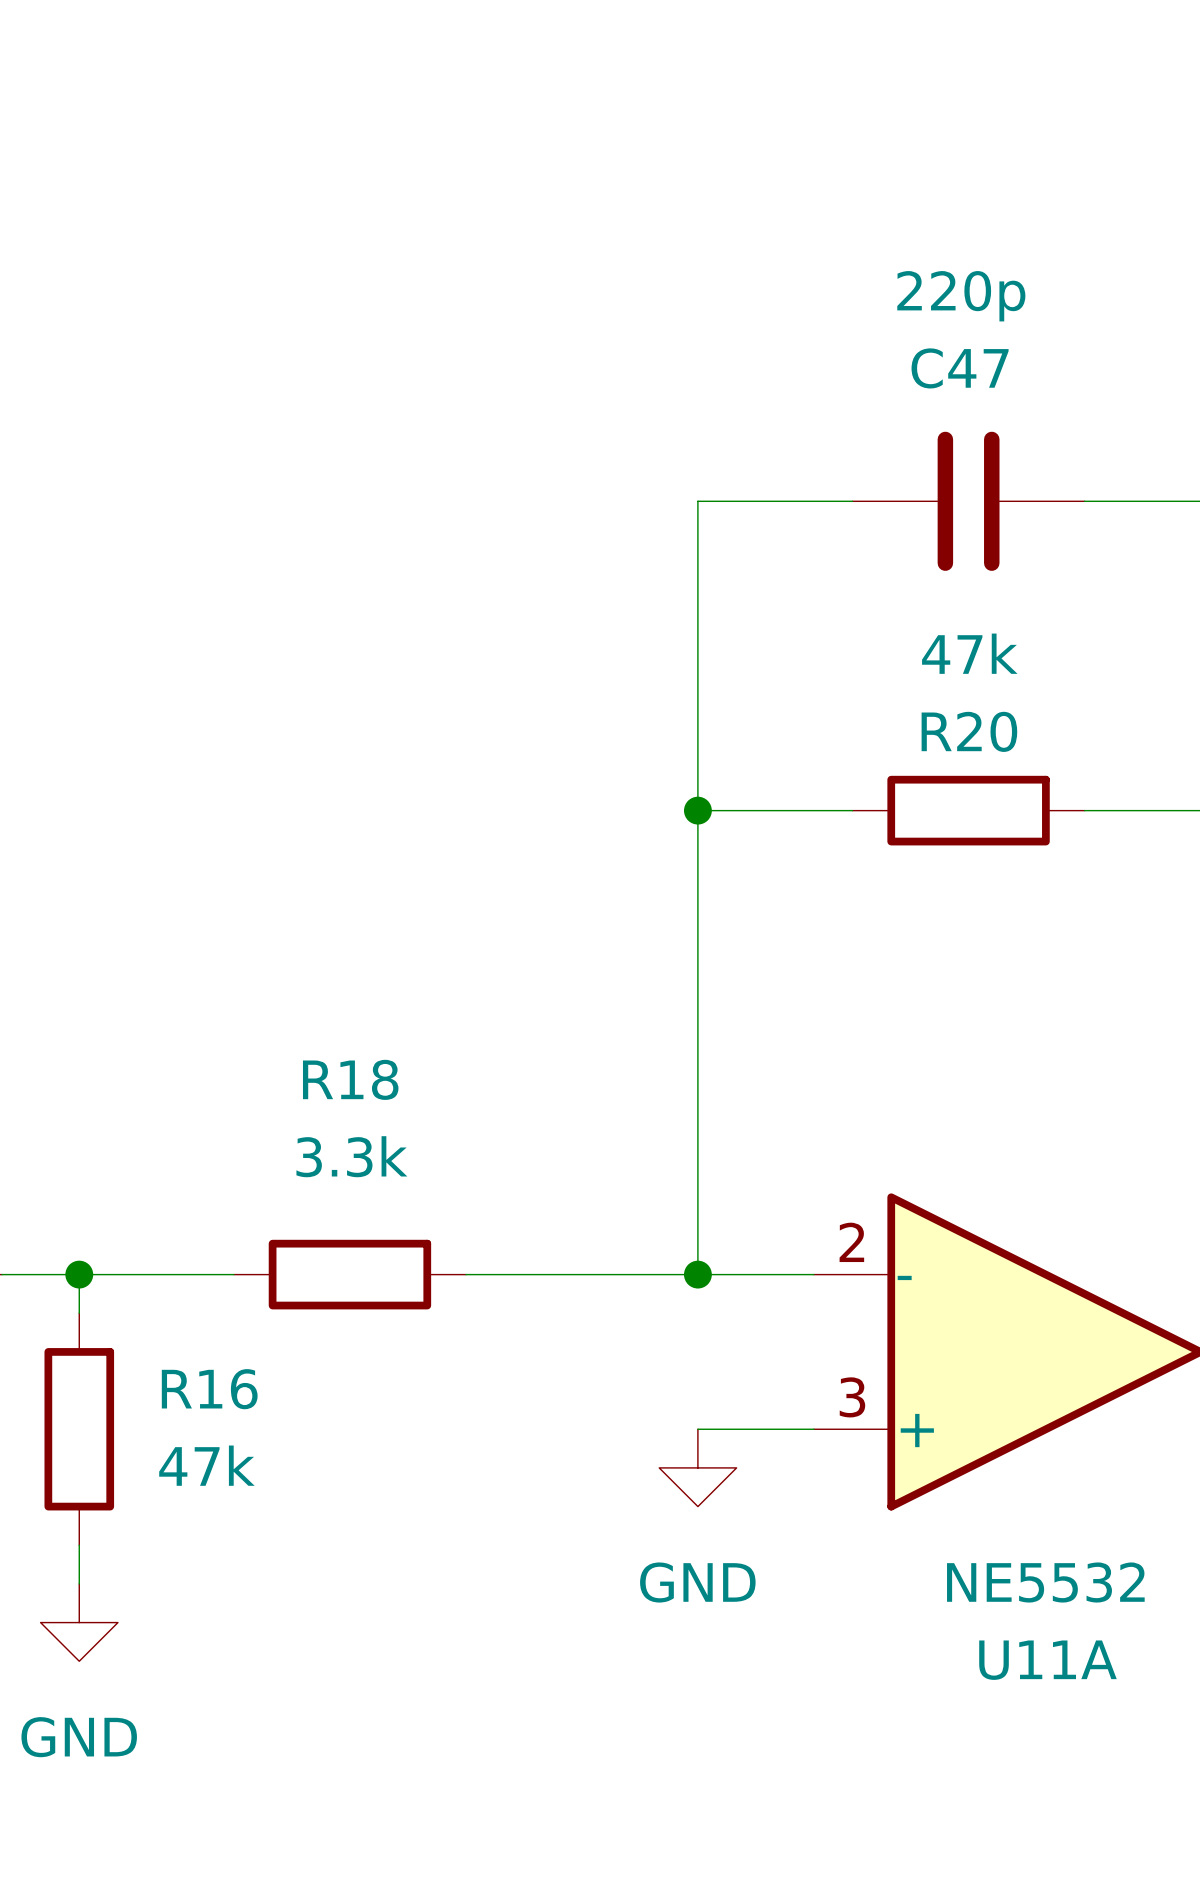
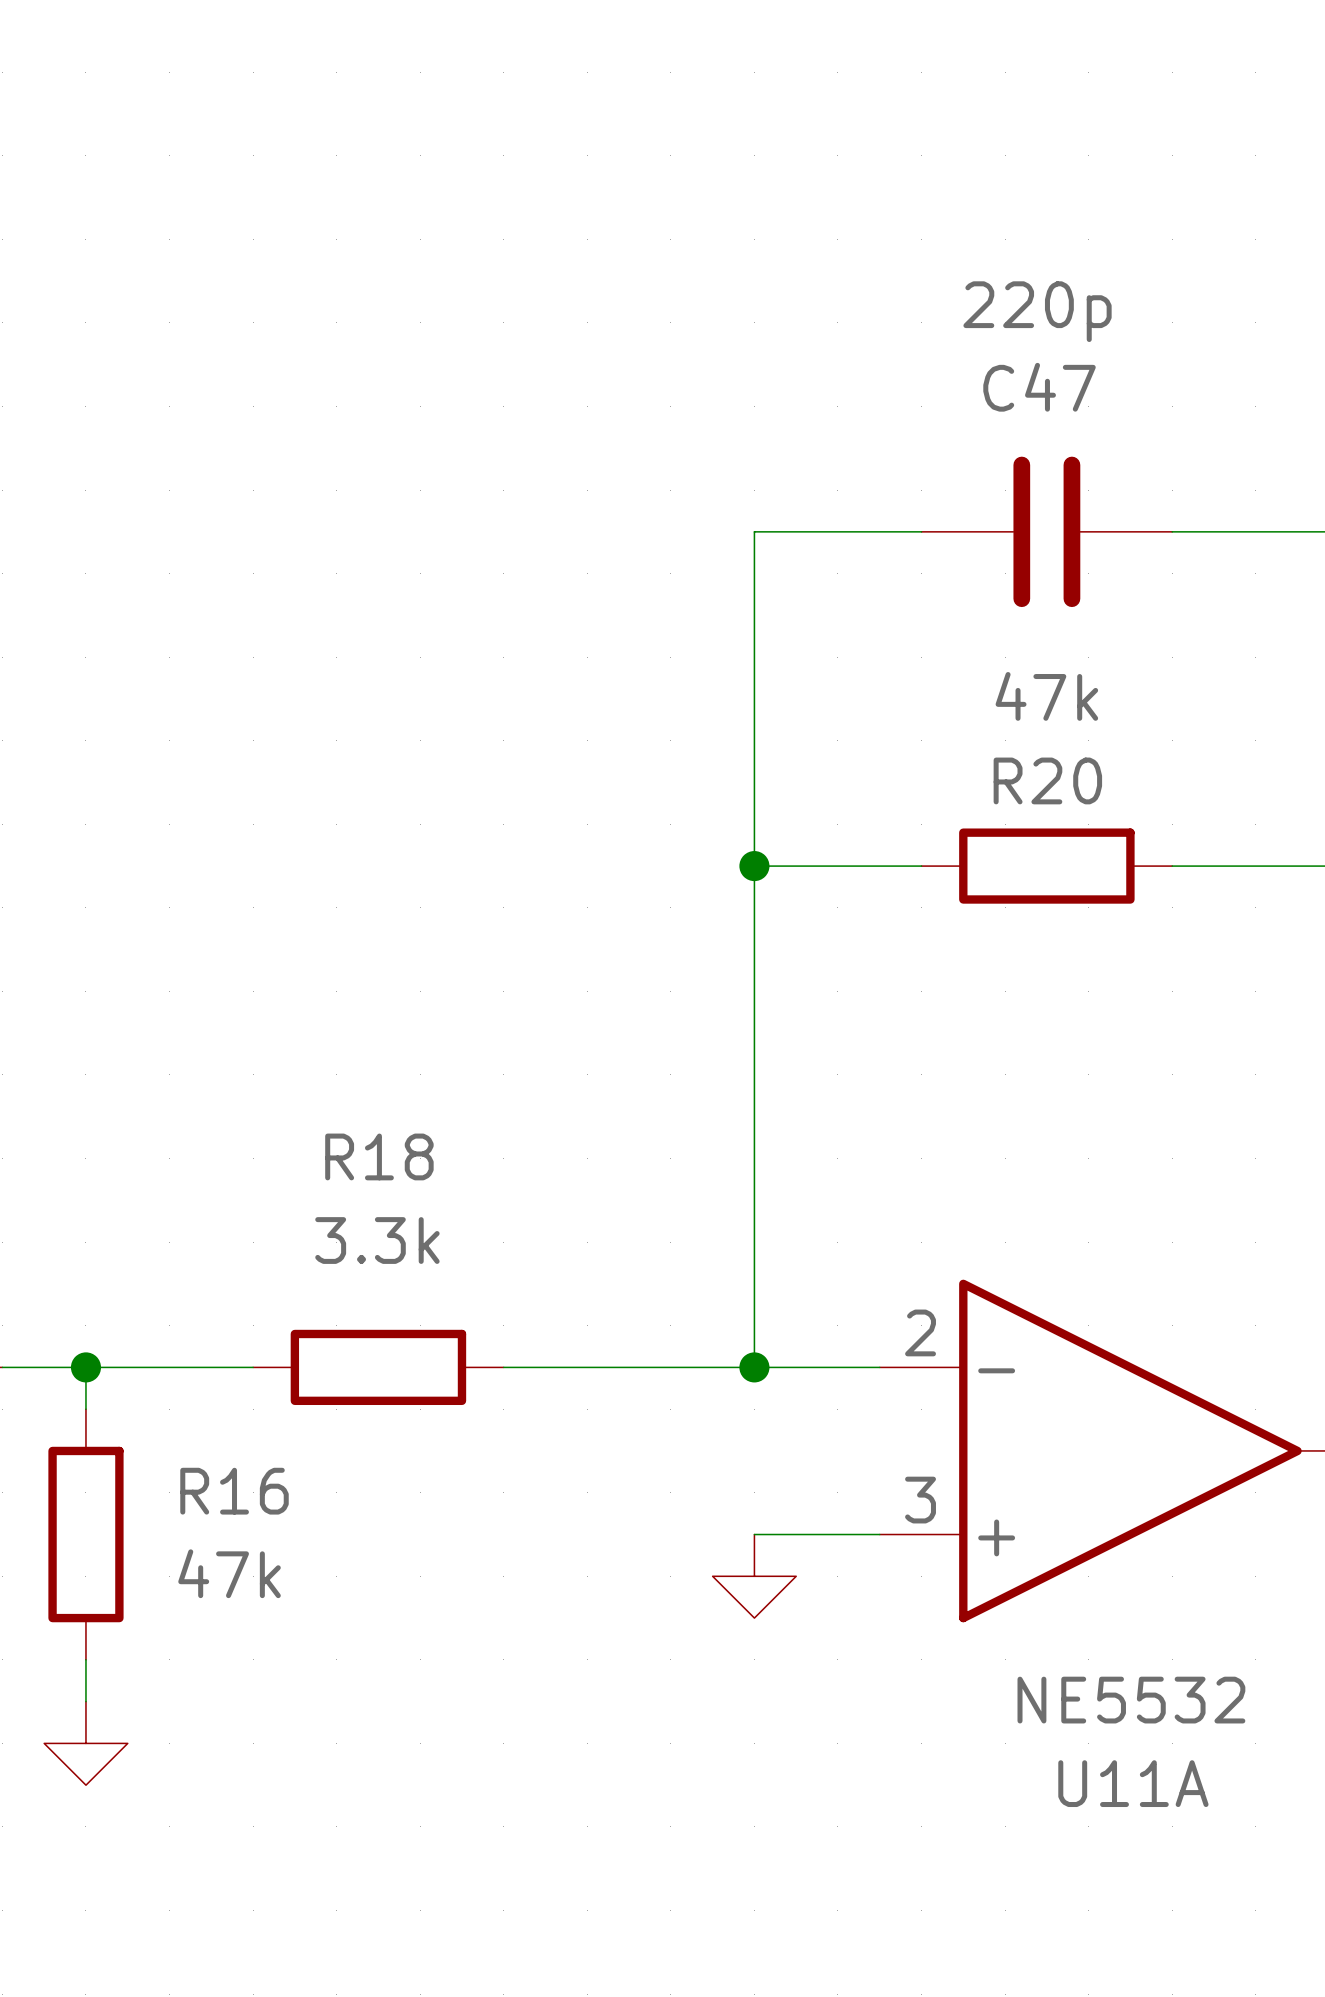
power symbol text: GND (697, 1582) -> none
power symbol text: GND (79, 1737) -> none

